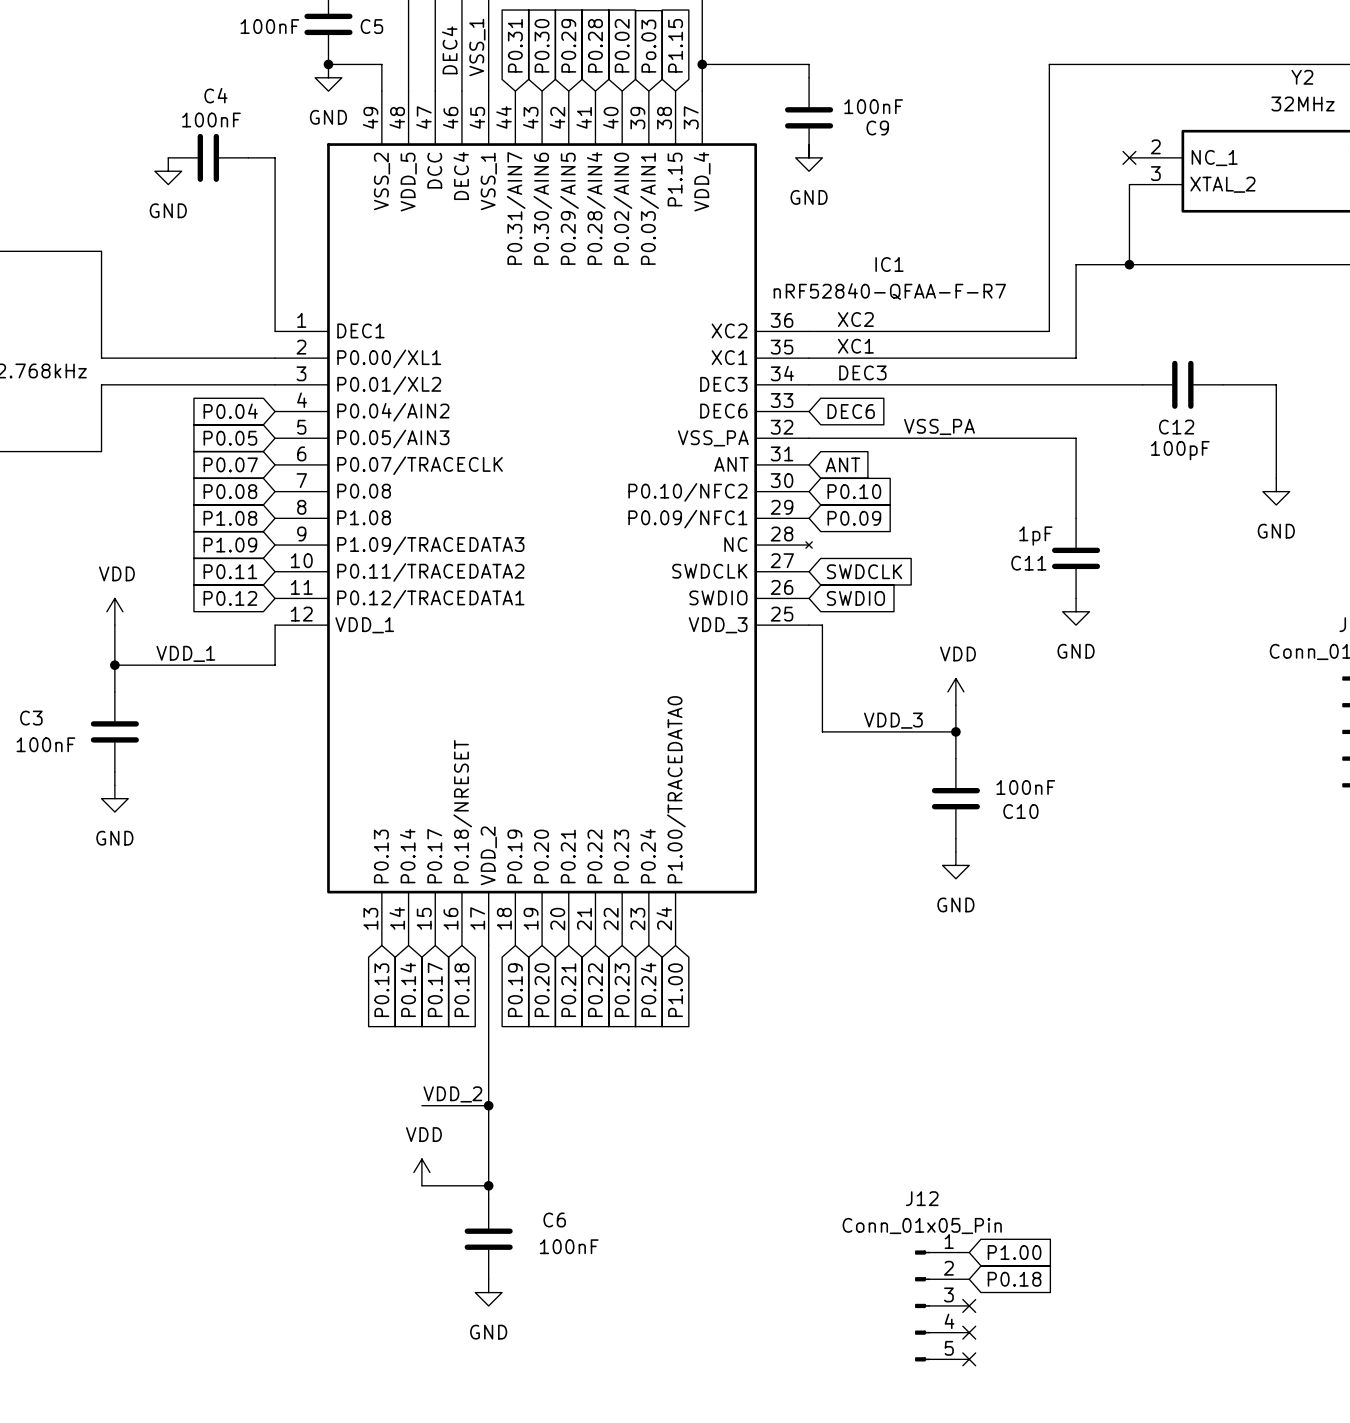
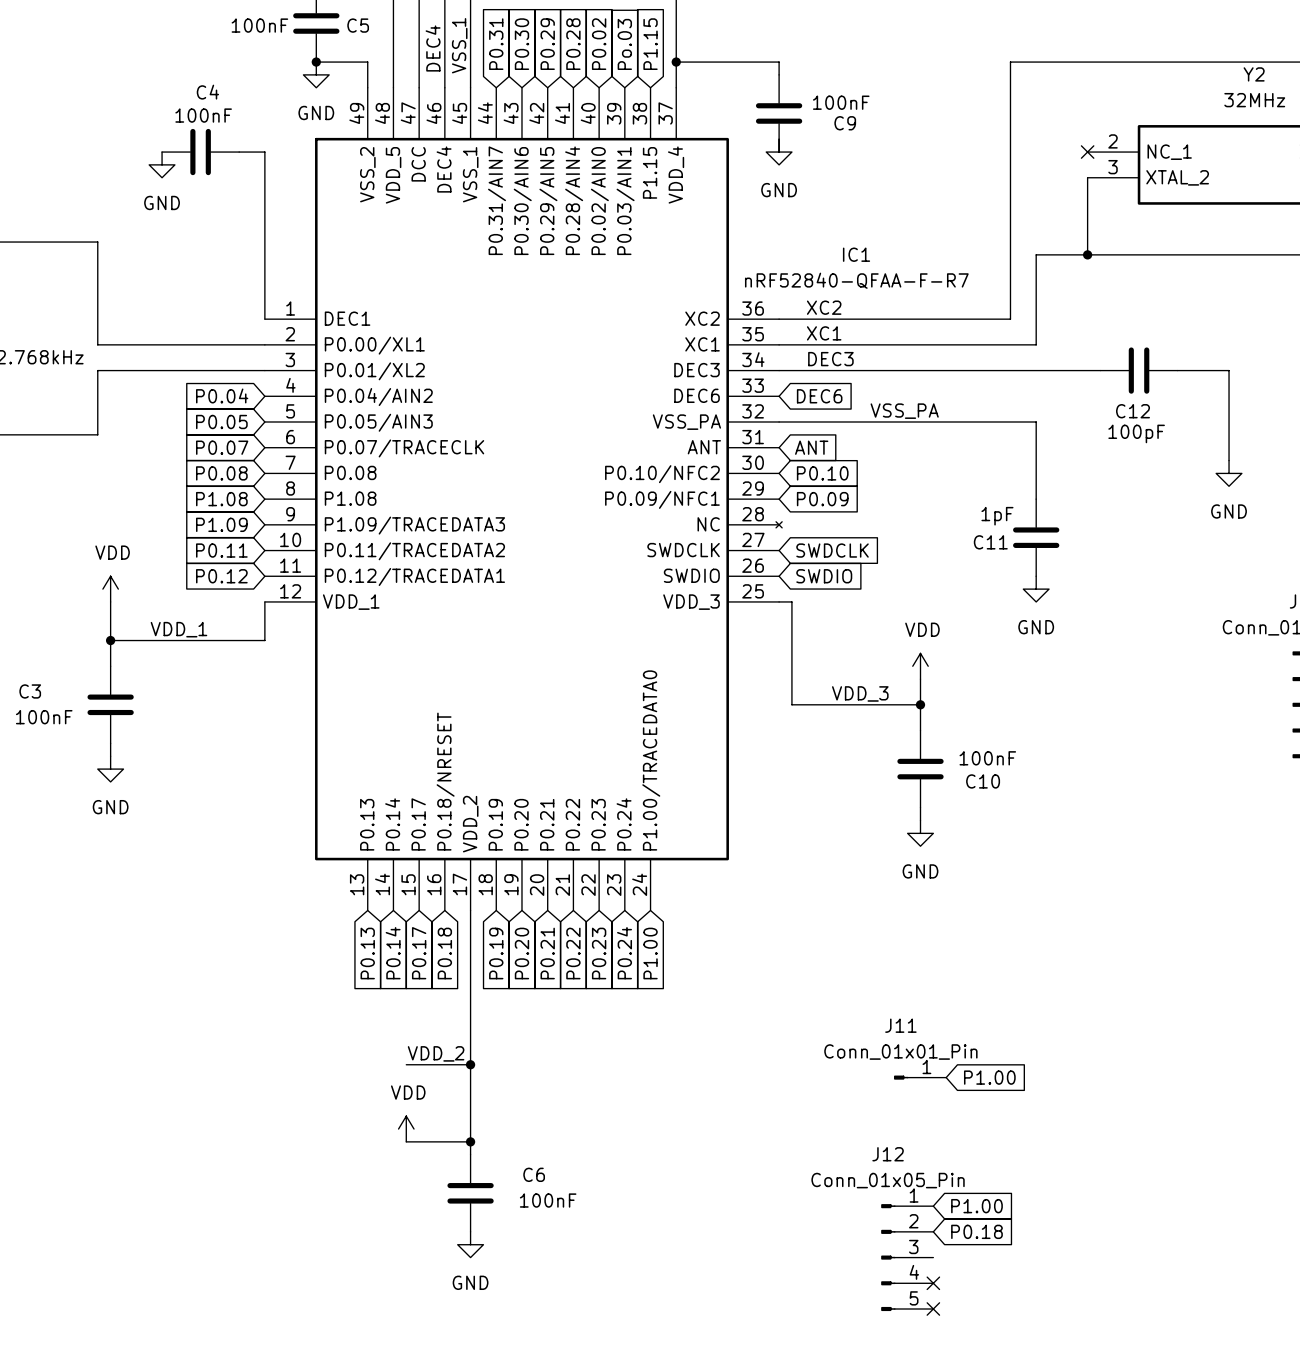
J11: none -> Conn_01x01_Pin (920, 1077)
global label: none -> P1.00 (989, 1077)
no-connect mark: (969, 1305) -> none

